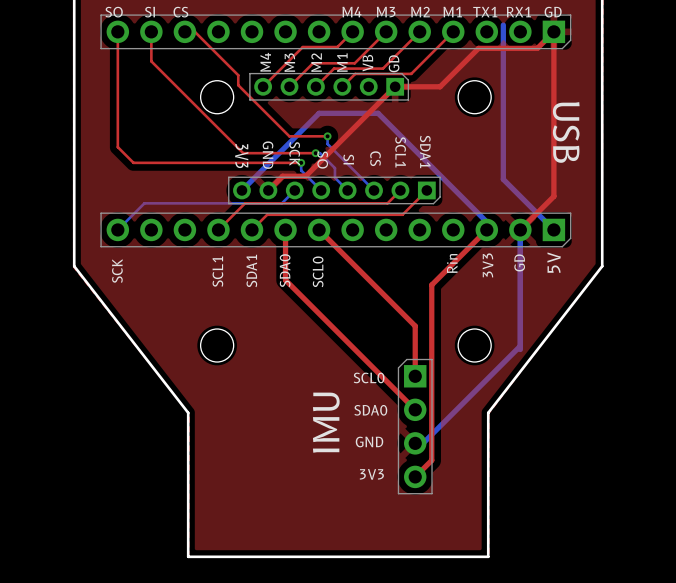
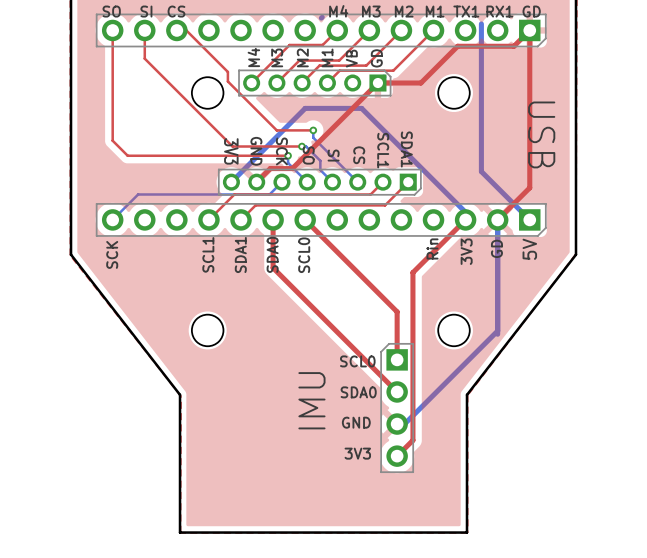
bottom track: none -> (322, 17) (321, 18)

